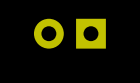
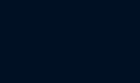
part: (69, 33) -> none

